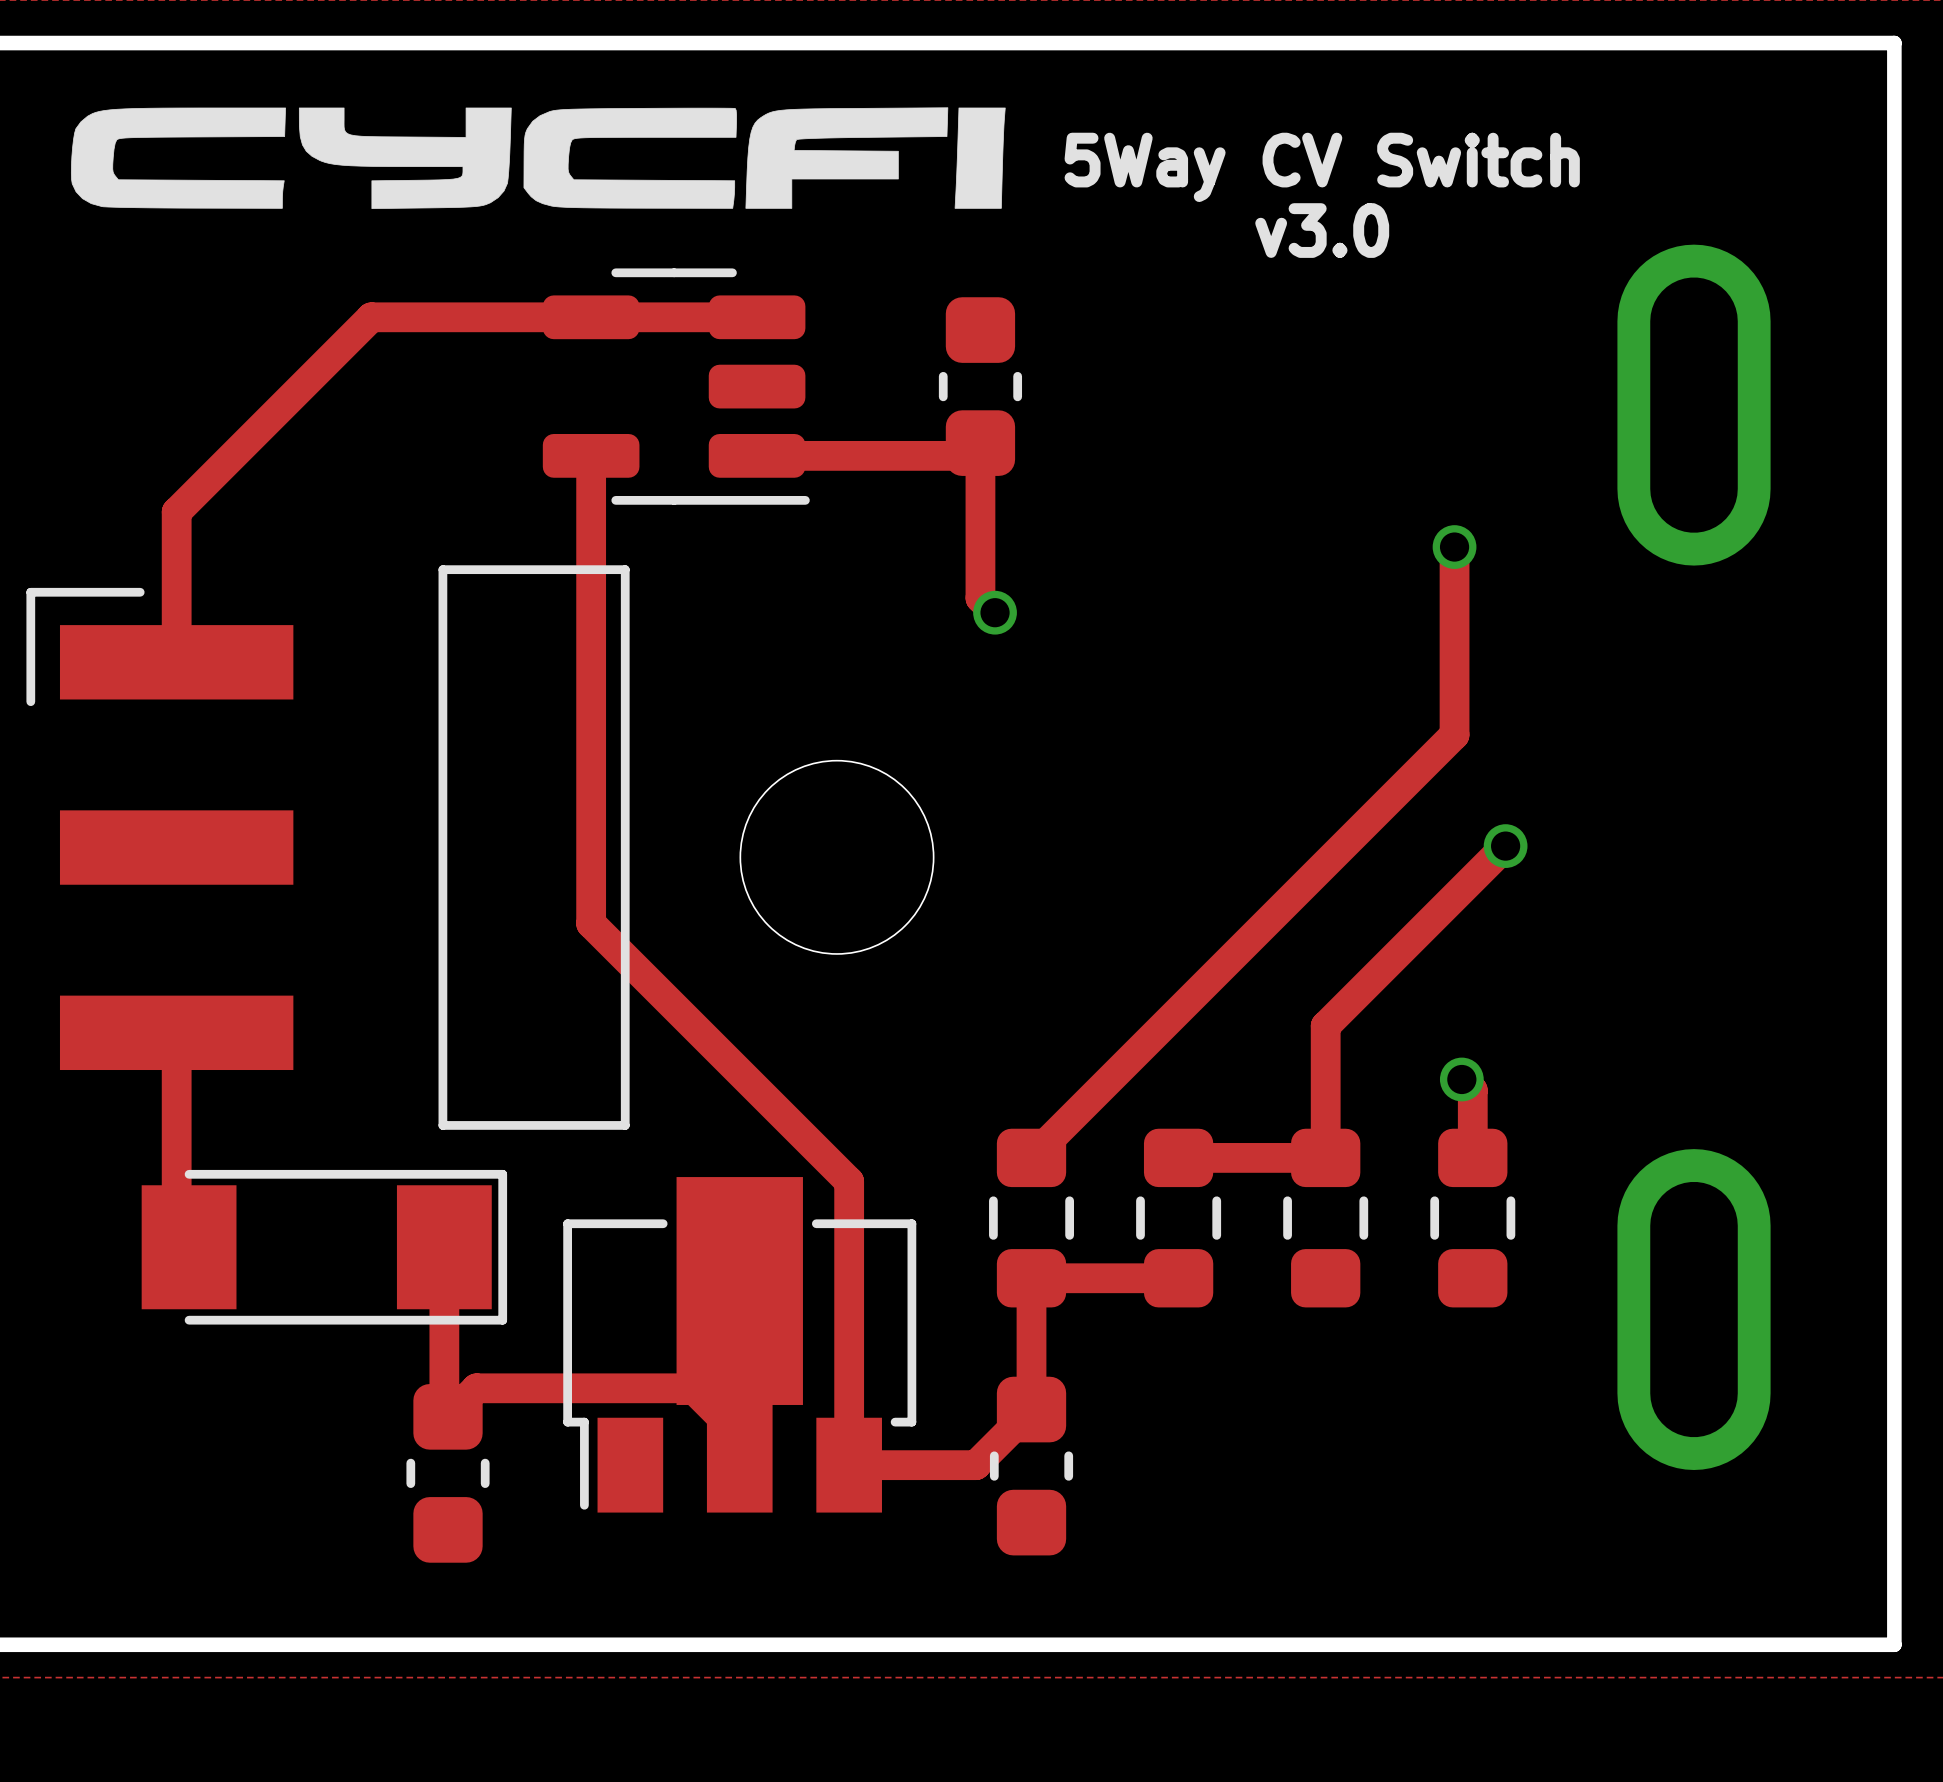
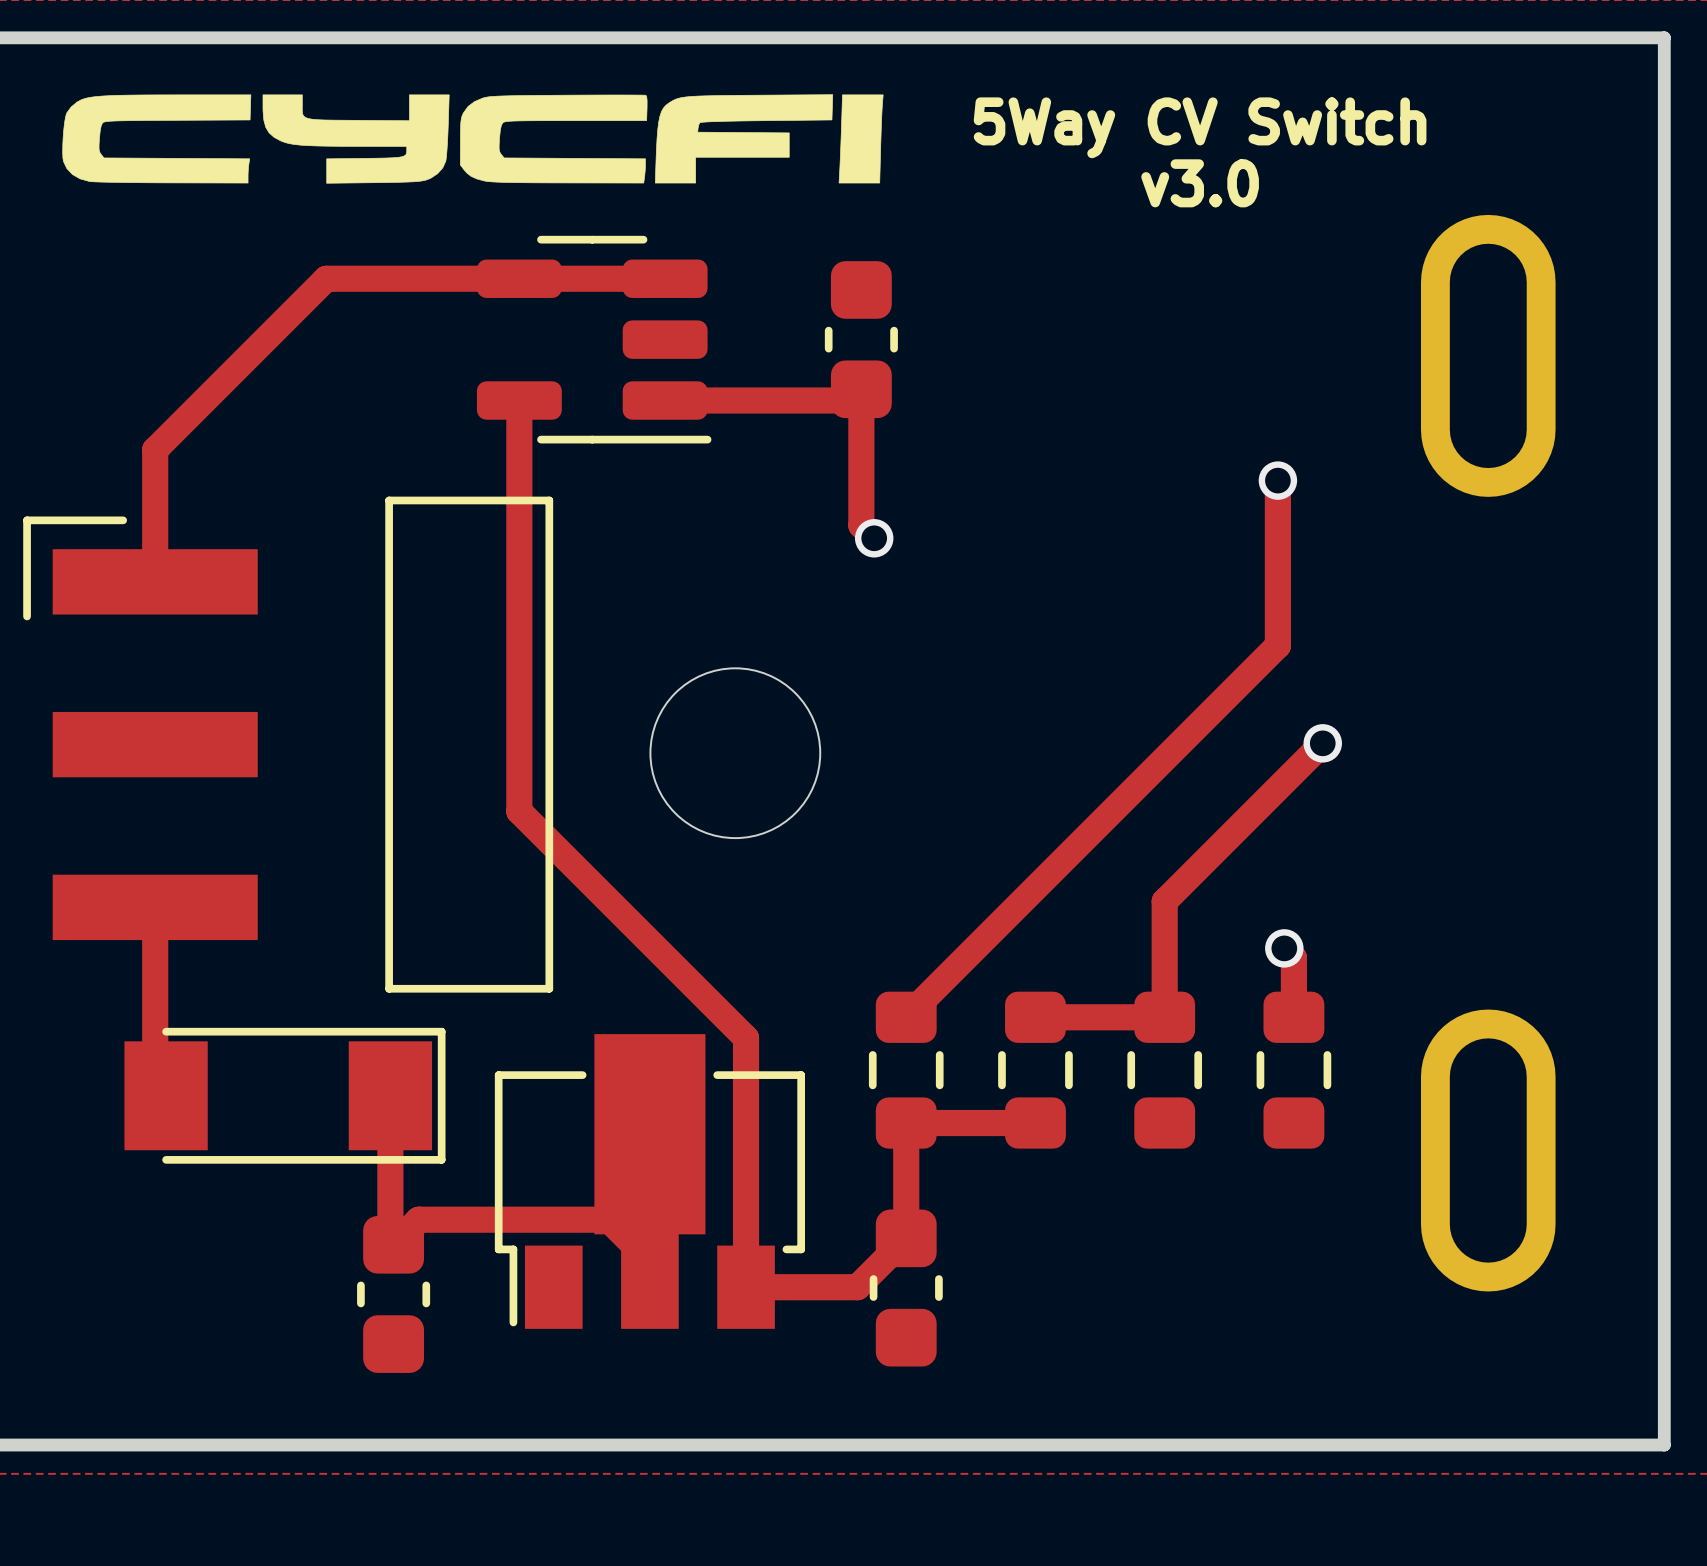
text position: 5Way CV Switch (1322, 167) -> 5Way CV Switch (1200, 127)
text position: v3.0 (1322, 230) -> v3.0 (1200, 183)

